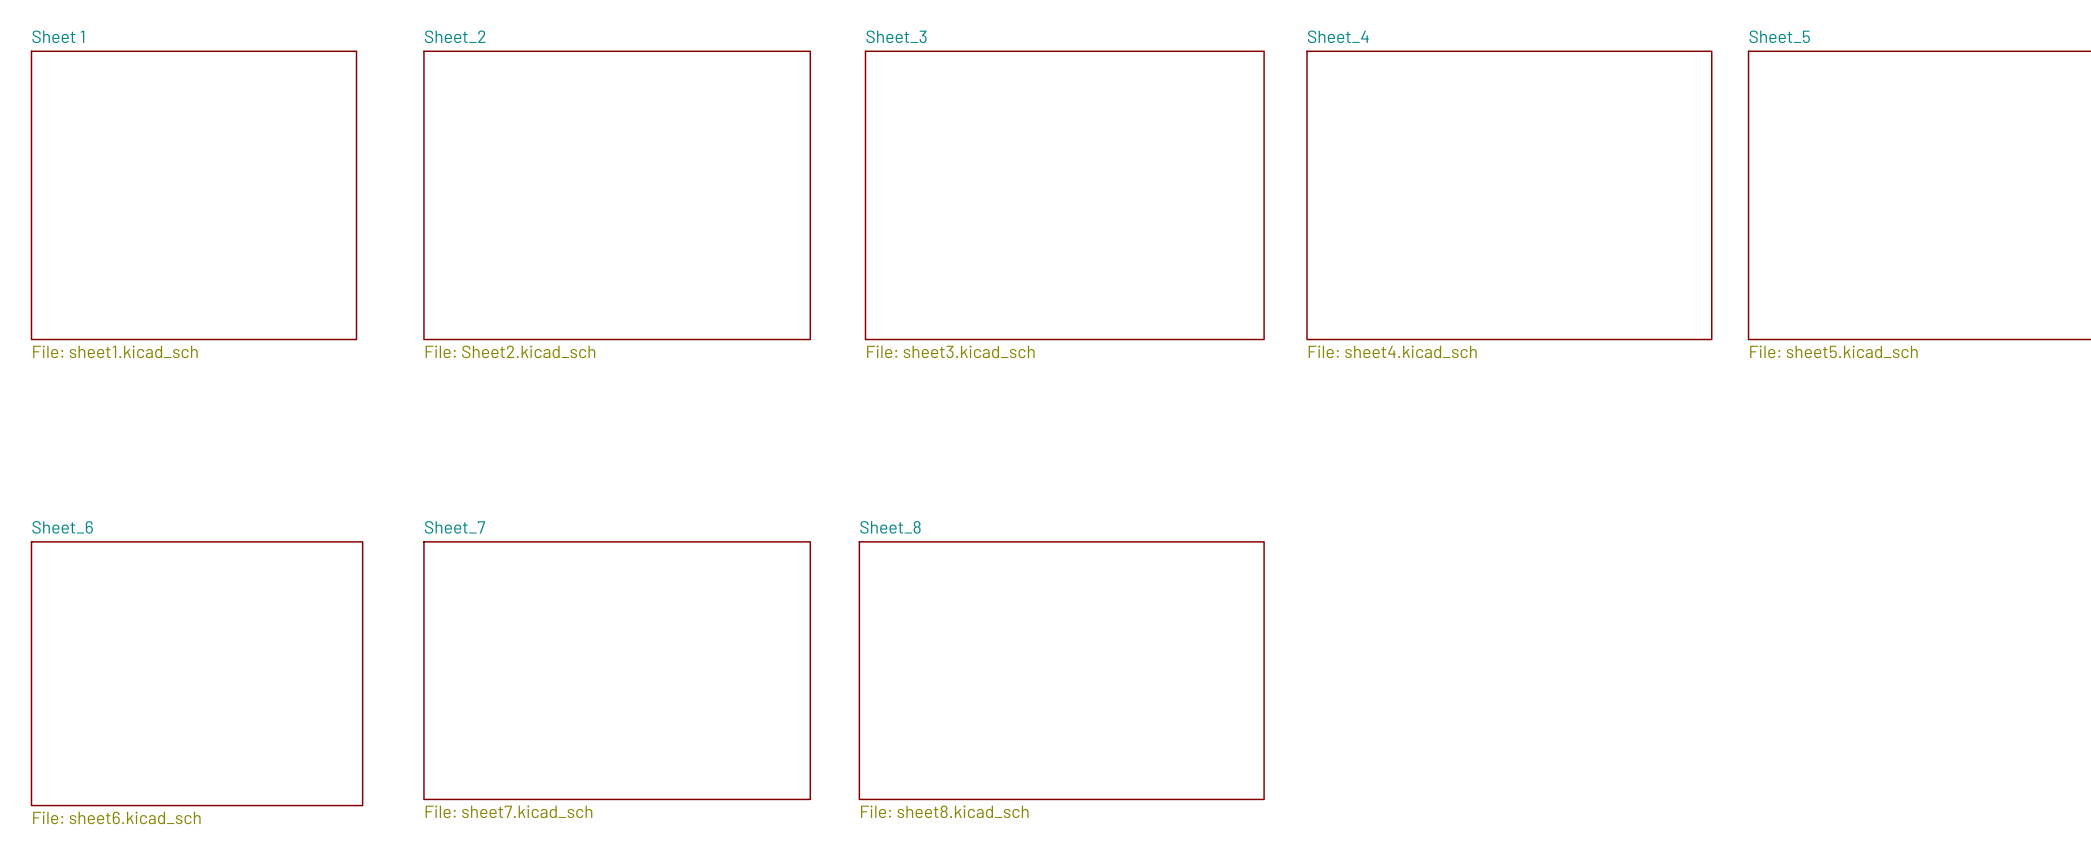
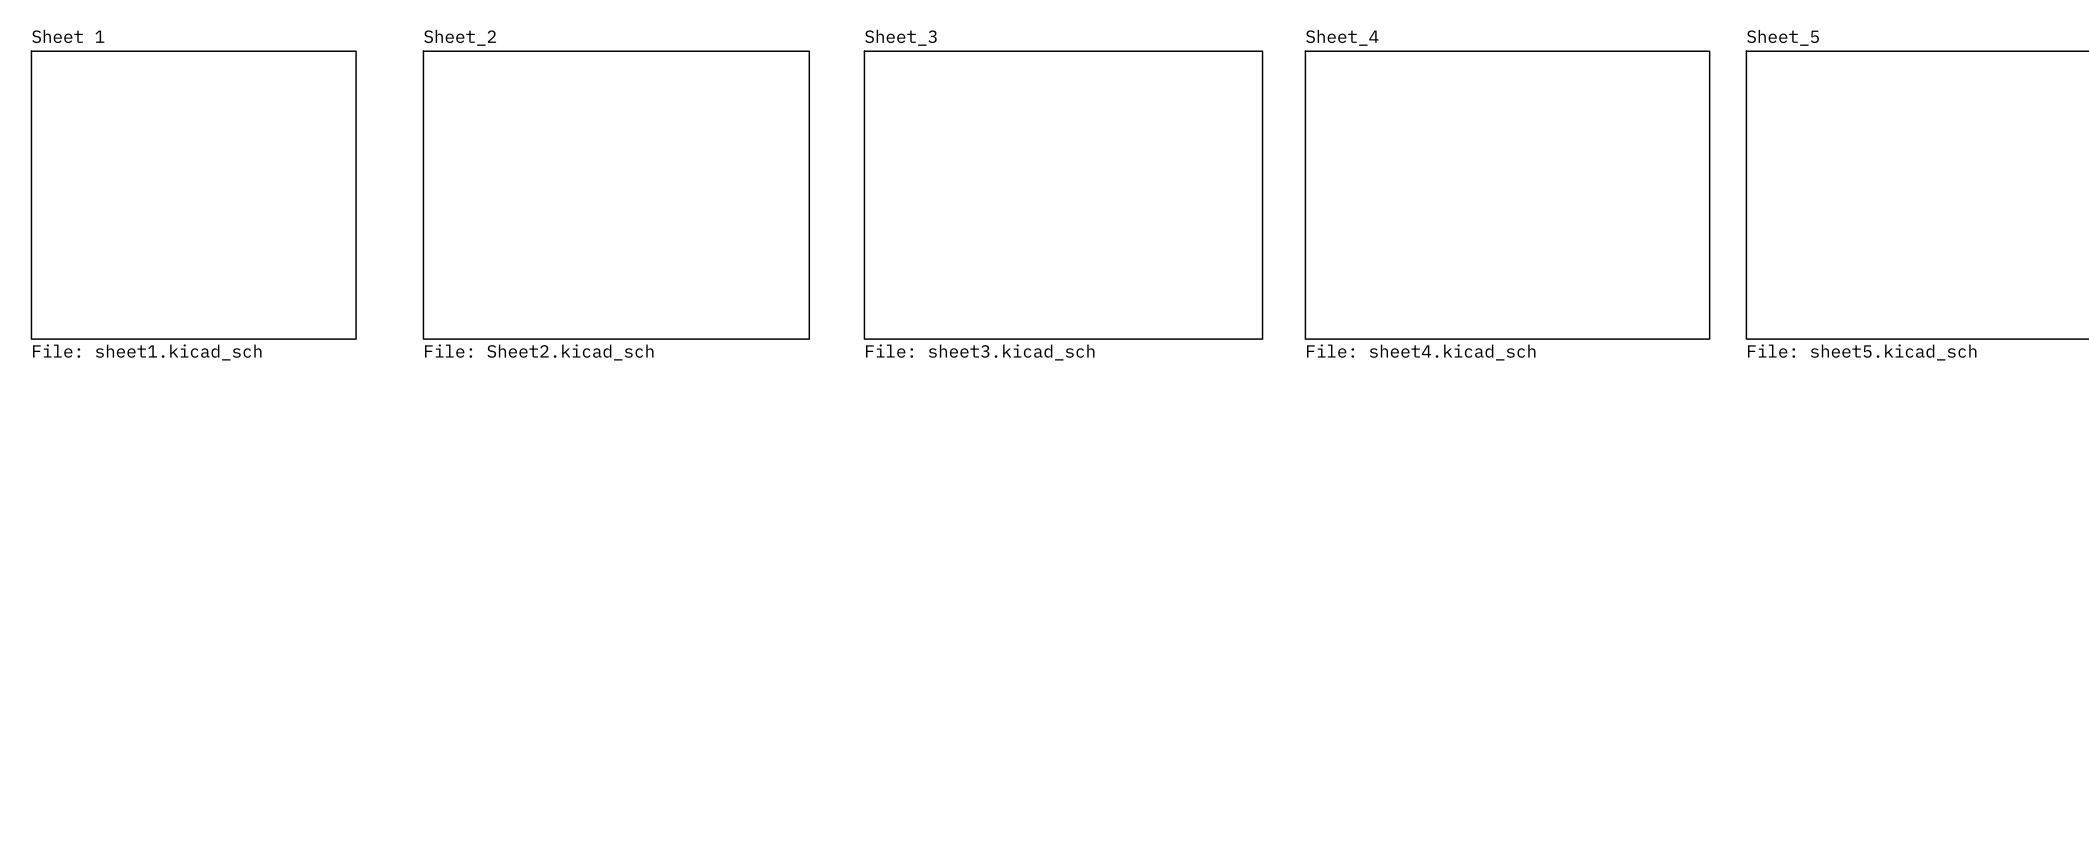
sheet Sheet_7: File: sheet7.kicad_sch (617, 670) -> none
sheet Sheet_8: File: sheet8.kicad_sch (1061, 670) -> none
sheet Sheet_6: File: sheet6.kicad_sch (197, 673) -> none

